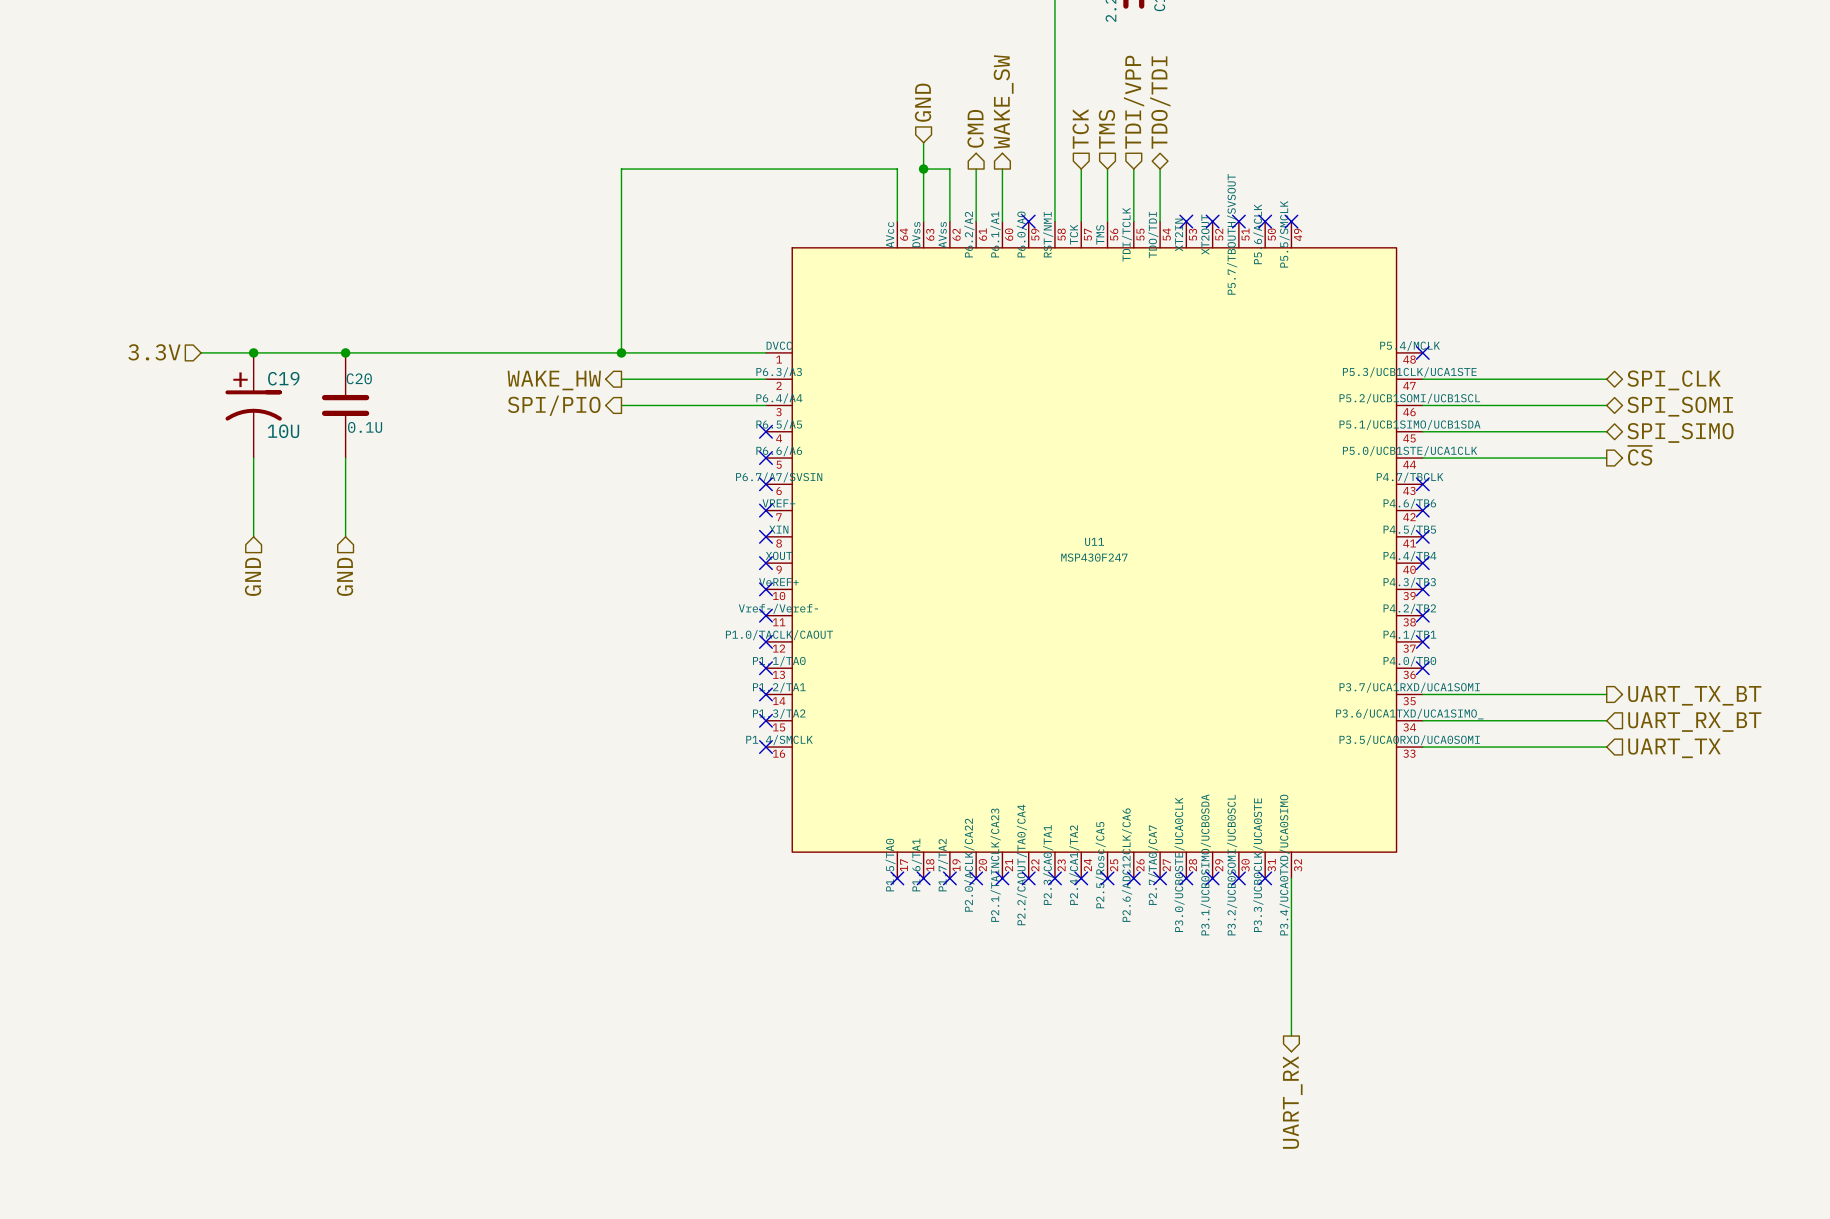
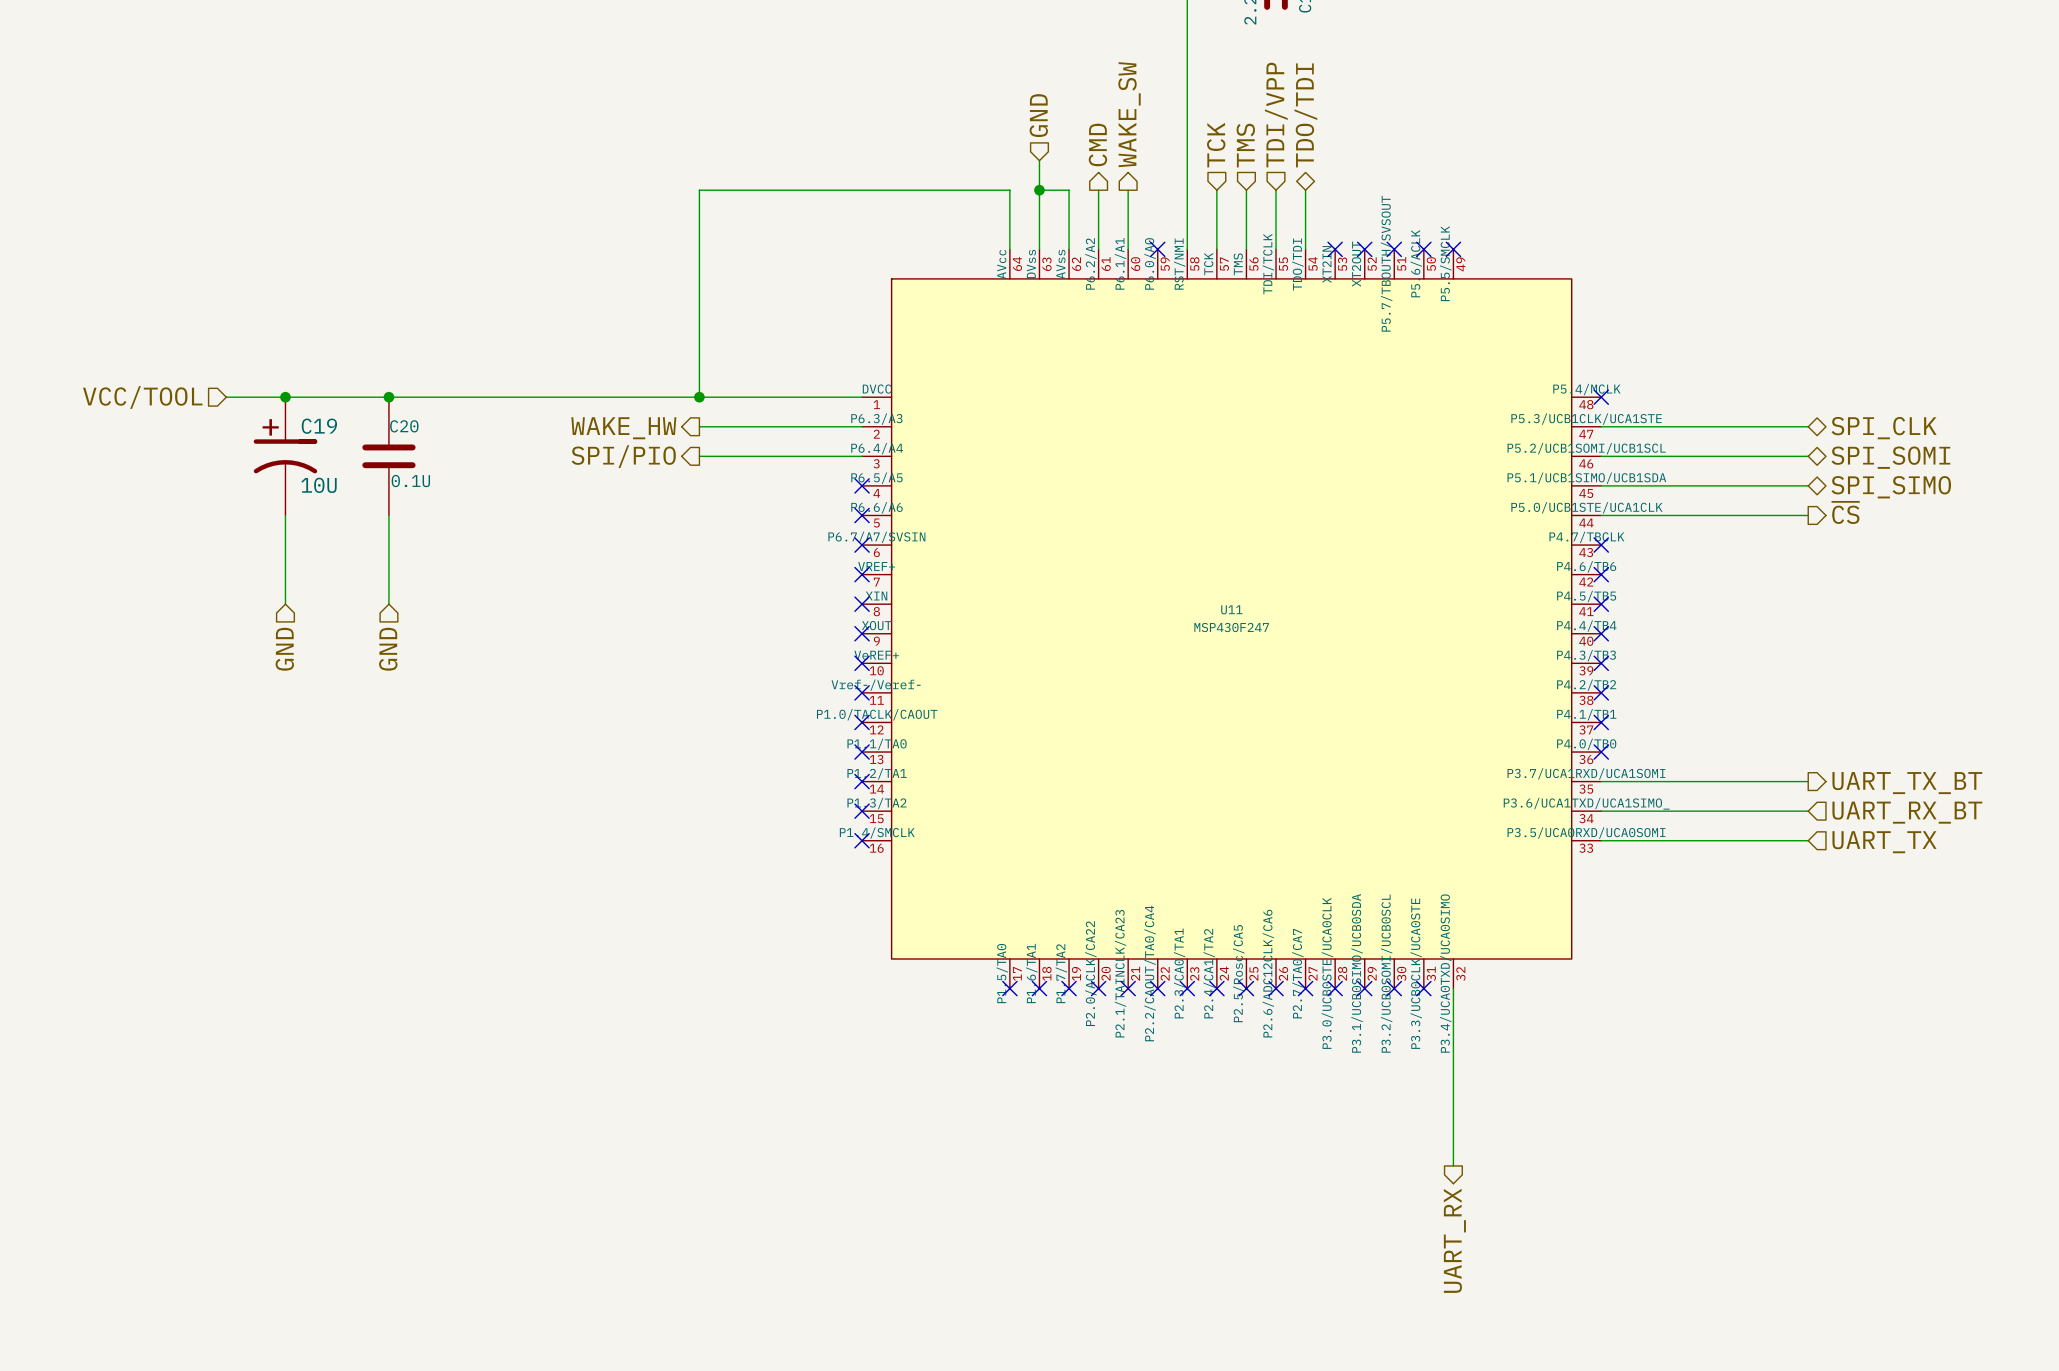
hierarchical label: 3.3V (154, 352) -> VCC/TOOL (142, 397)

